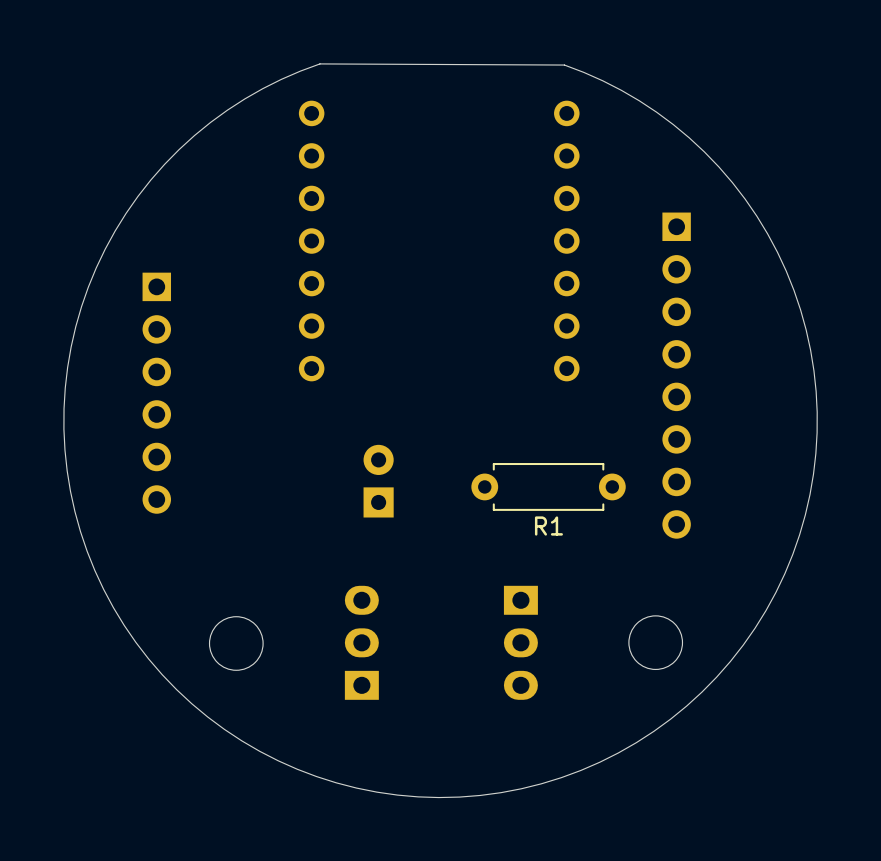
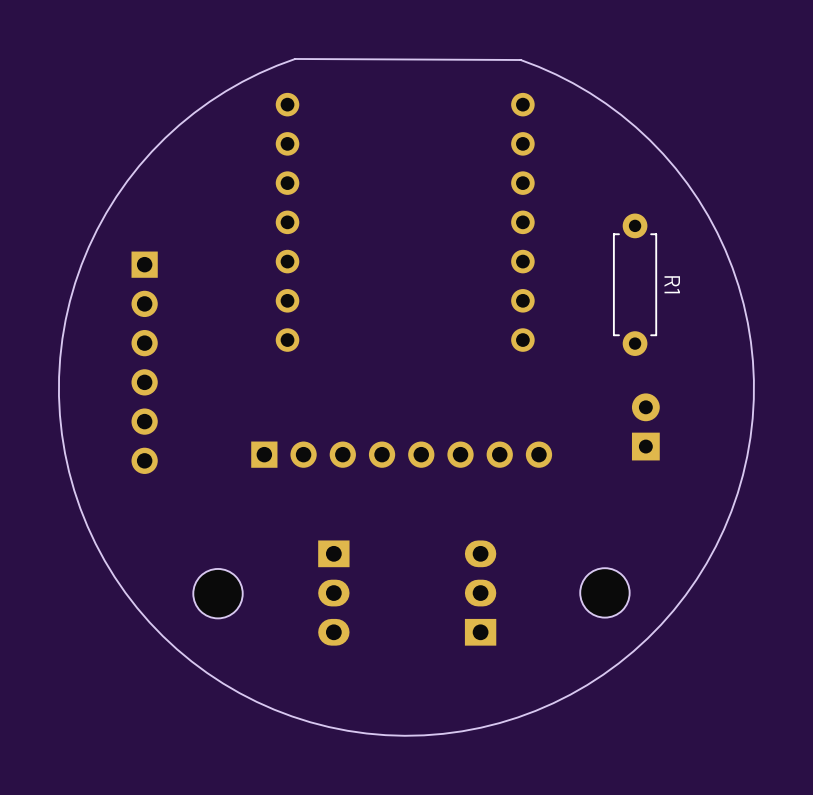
part rotation: 0° (676, 375) -> 90° counterclockwise (401, 454)
part position: (676, 375) -> (401, 454)
part position: (378, 481) -> (645, 426)
R1 rotation: 0° (548, 486) -> 90° clockwise (635, 284)
R1 position: (548, 486) -> (635, 284)
R1 name position: R1 (548, 526) -> R1 (672, 284)
part rotation: 0° (361, 642) -> 180° (333, 593)
part rotation: 0° (520, 642) -> 180° (480, 593)

